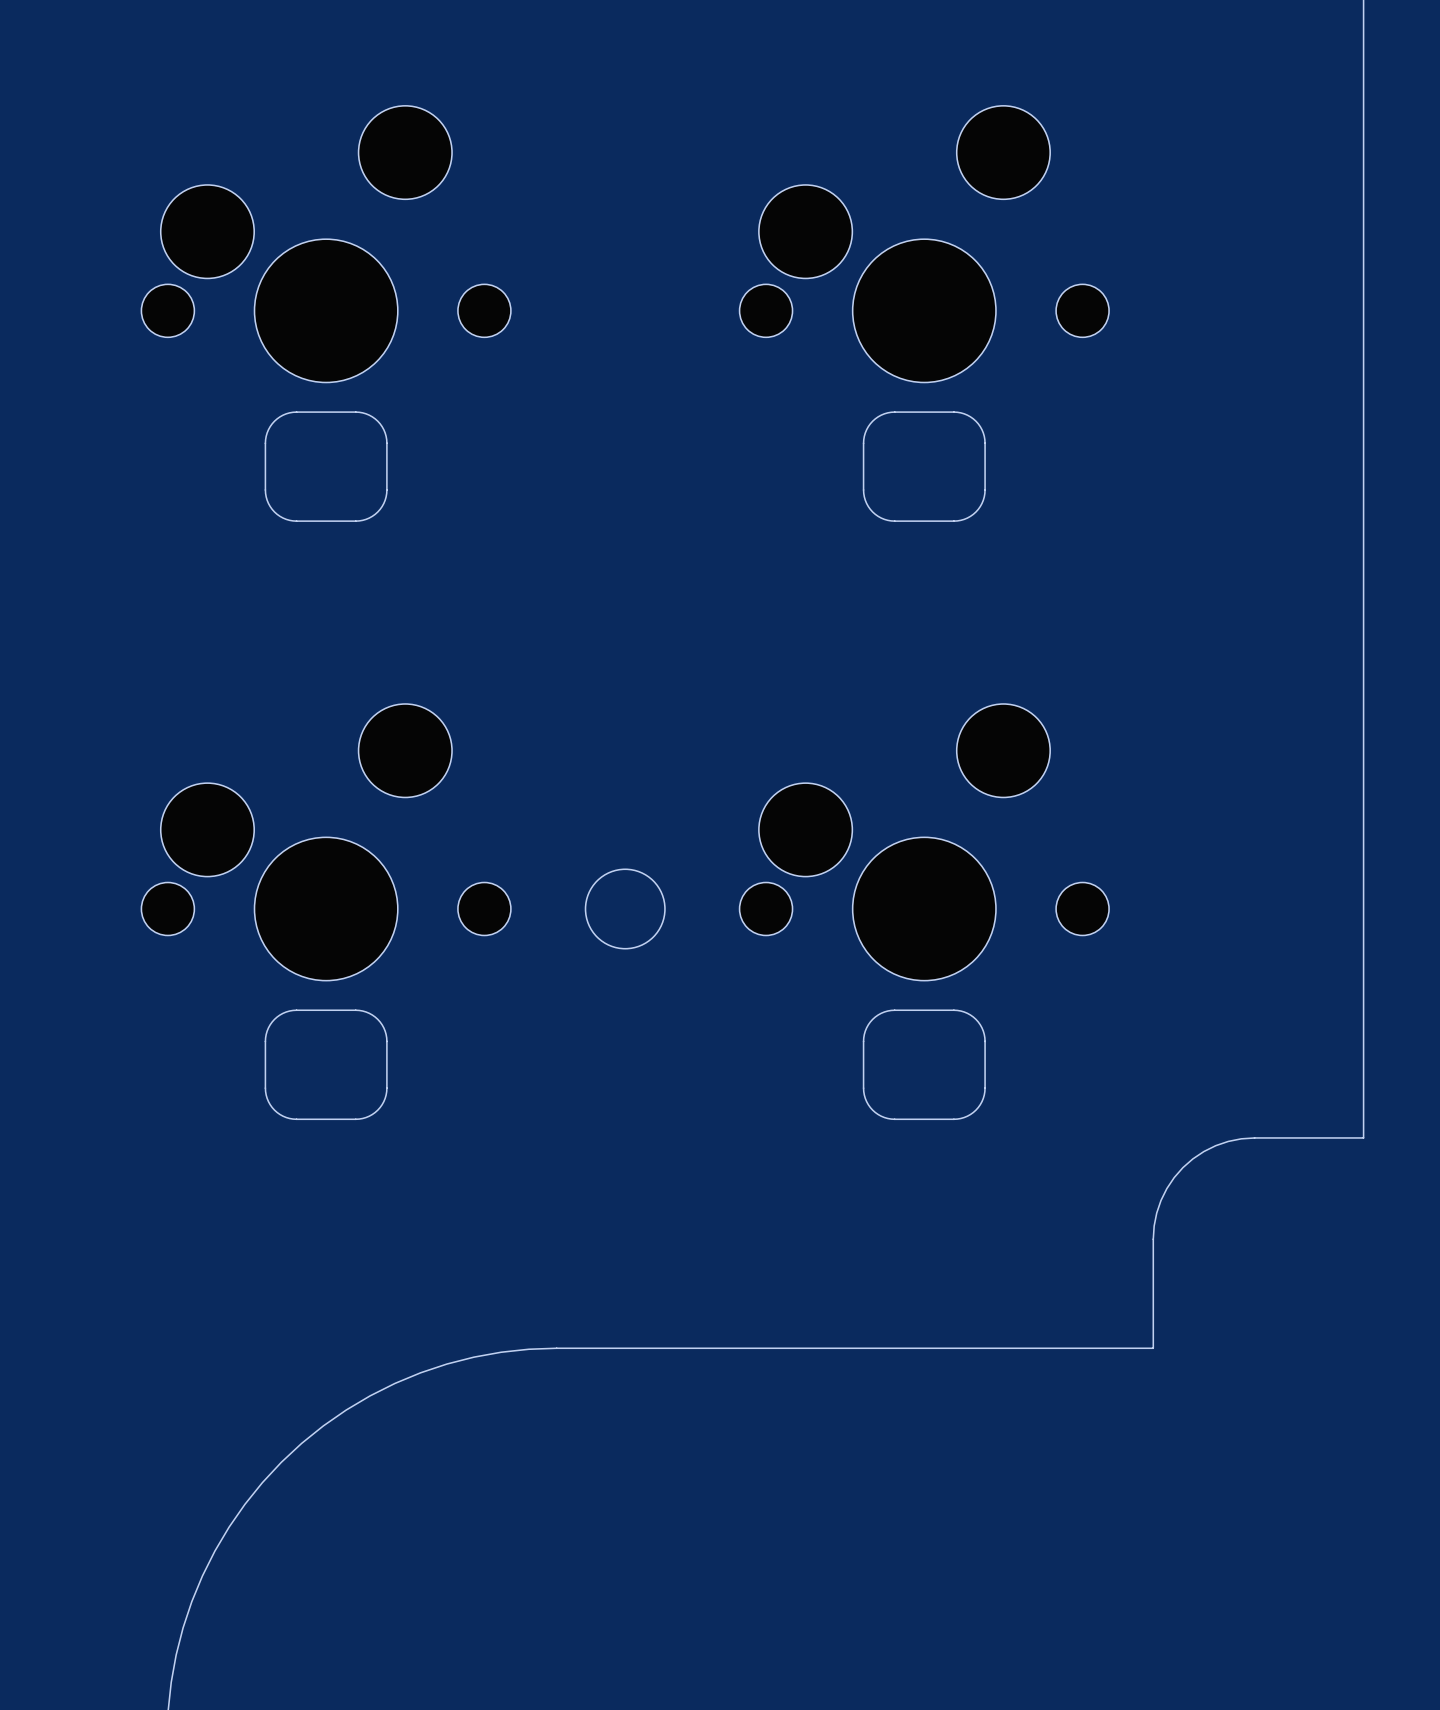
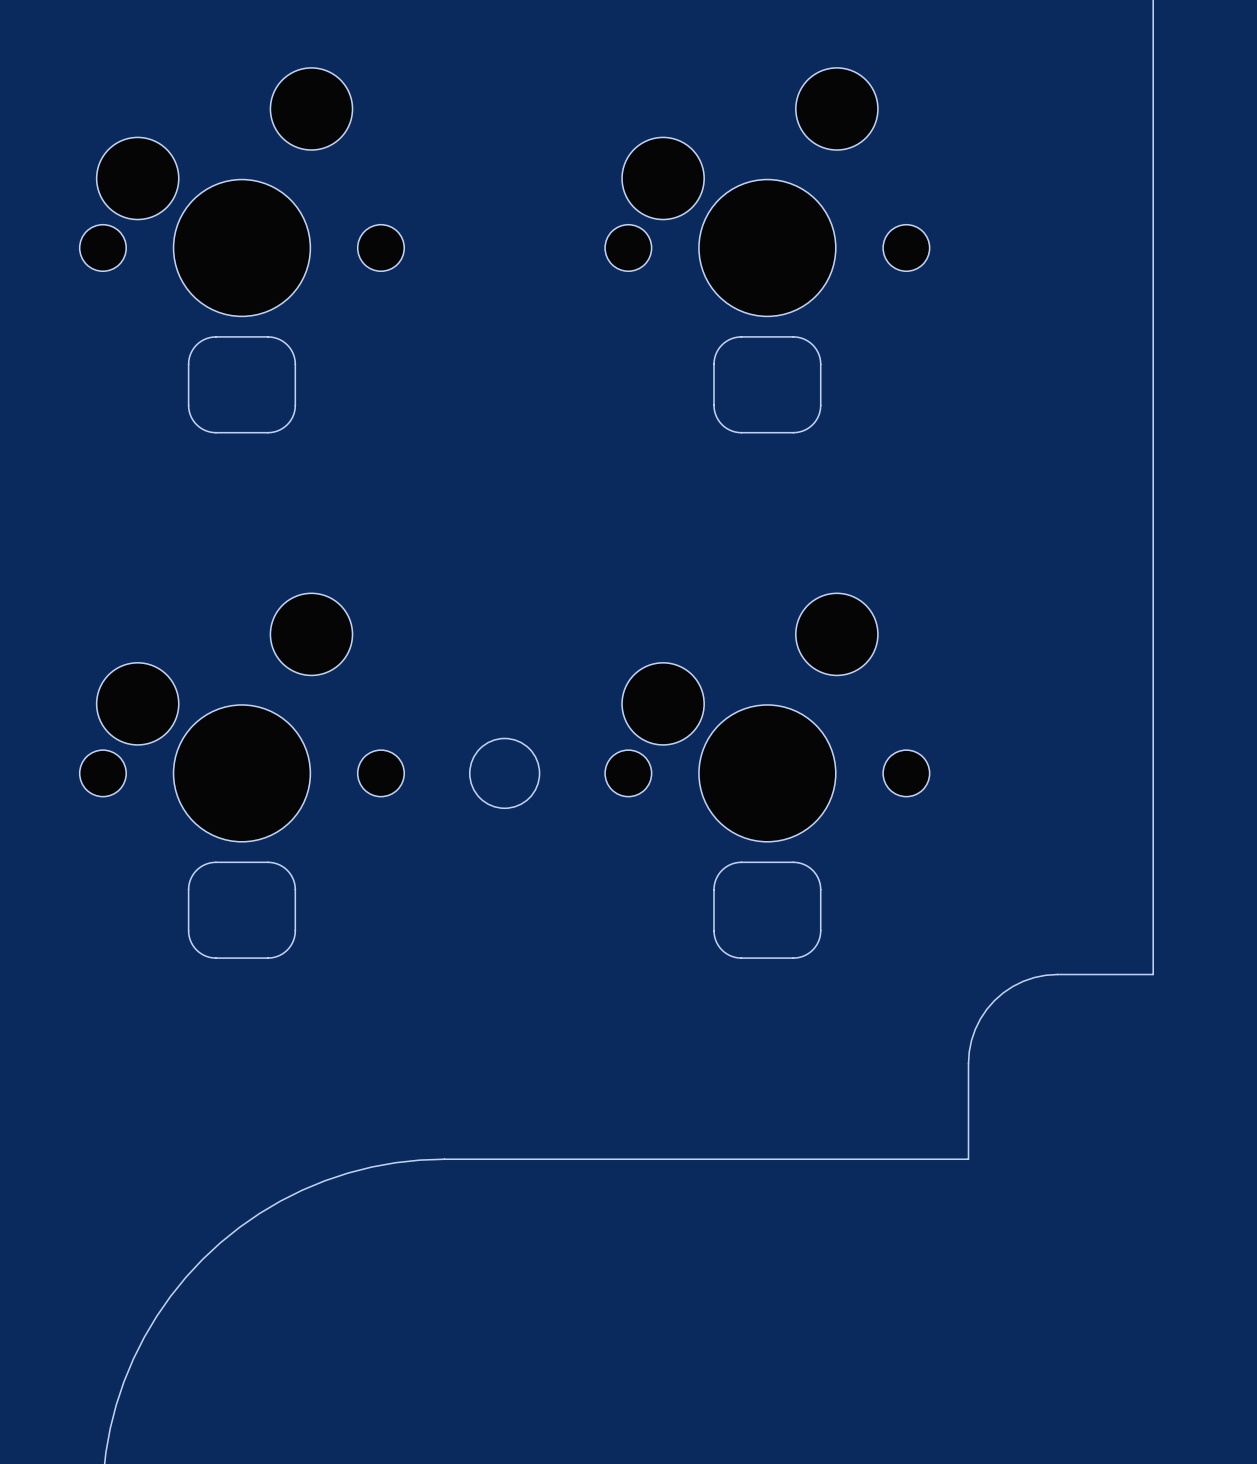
part footprint: [141, 105, 511, 383] -> [79, 67, 405, 317]
part footprint: [739, 105, 1110, 383] -> [605, 67, 930, 317]
part footprint: [141, 704, 511, 981] -> [79, 593, 405, 842]
part footprint: [739, 704, 1110, 981] -> [605, 593, 930, 842]

